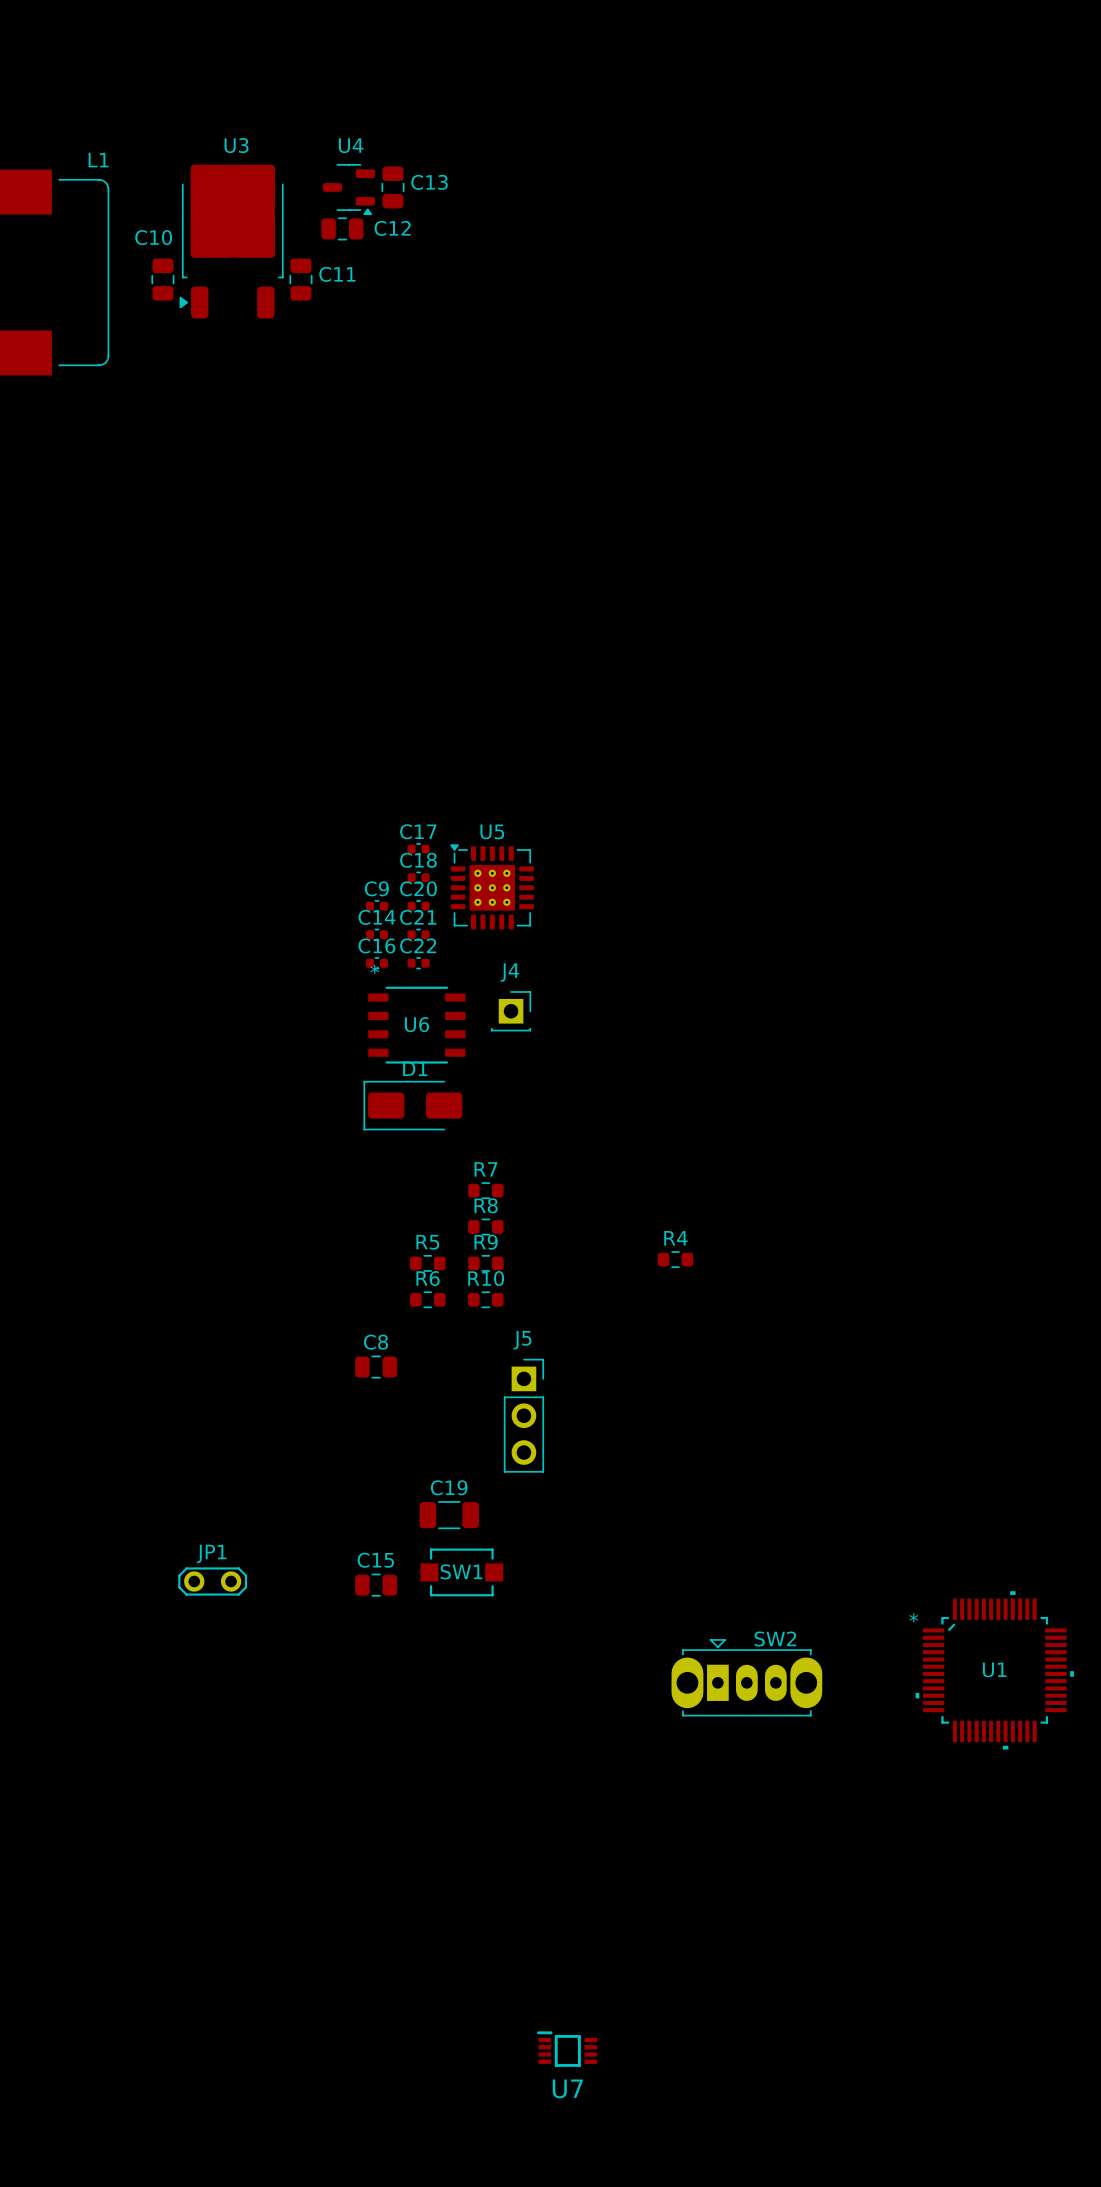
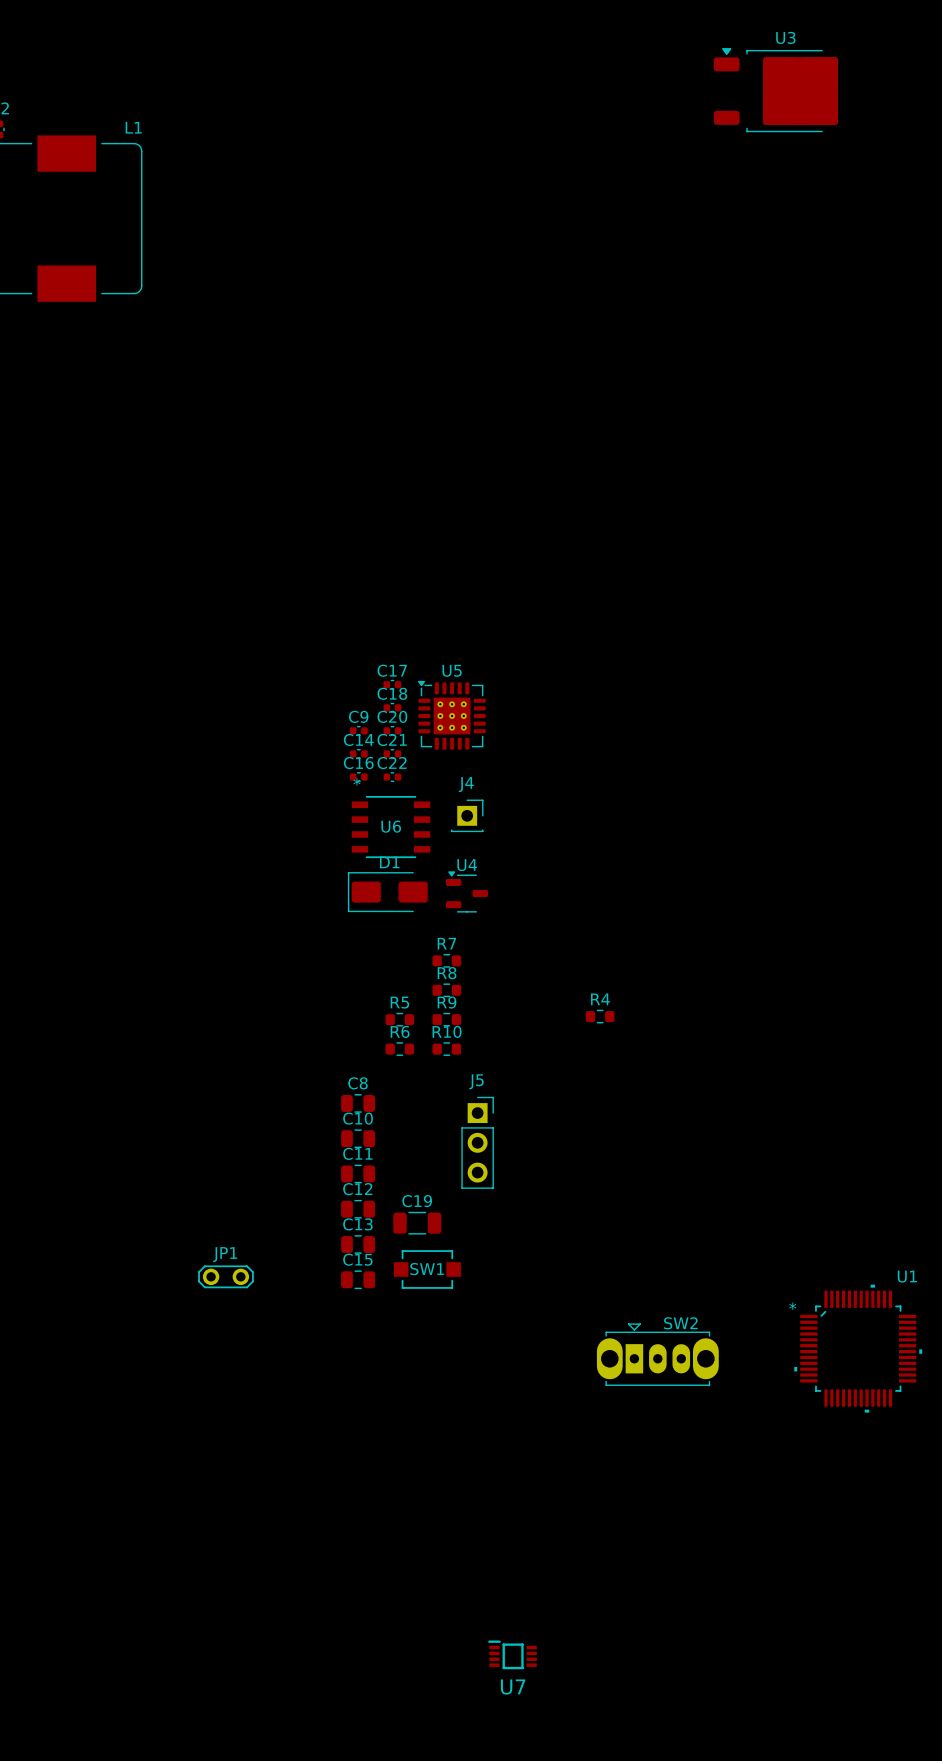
U3 name position: U3 (236, 145) -> U3 (785, 37)
C13 name position: C13 (429, 182) -> C13 (357, 1224)
C13 rotation: 0° (392, 187) -> 90° clockwise (358, 1244)
C13 position: (392, 187) -> (358, 1244)
U4 rotation: 0° (348, 189) -> 180° (466, 891)
U4 position: (348, 189) -> (466, 891)
C12 position: (342, 228) -> (358, 1209)
C12 name position: C12 (392, 228) -> C12 (357, 1189)
U3 rotation: 0° (231, 241) -> 90° clockwise (775, 90)
U3 position: (231, 241) -> (775, 90)
C11 name position: C11 (337, 274) -> C11 (357, 1153)
C10 rotation: 0° (162, 279) -> 90° clockwise (358, 1138)
C10 position: (162, 279) -> (358, 1138)
C11 rotation: 0° (300, 279) -> 90° clockwise (358, 1173)
C11 position: (300, 279) -> (358, 1173)
U1 name position: U1 (994, 1669) -> U1 (907, 1276)

